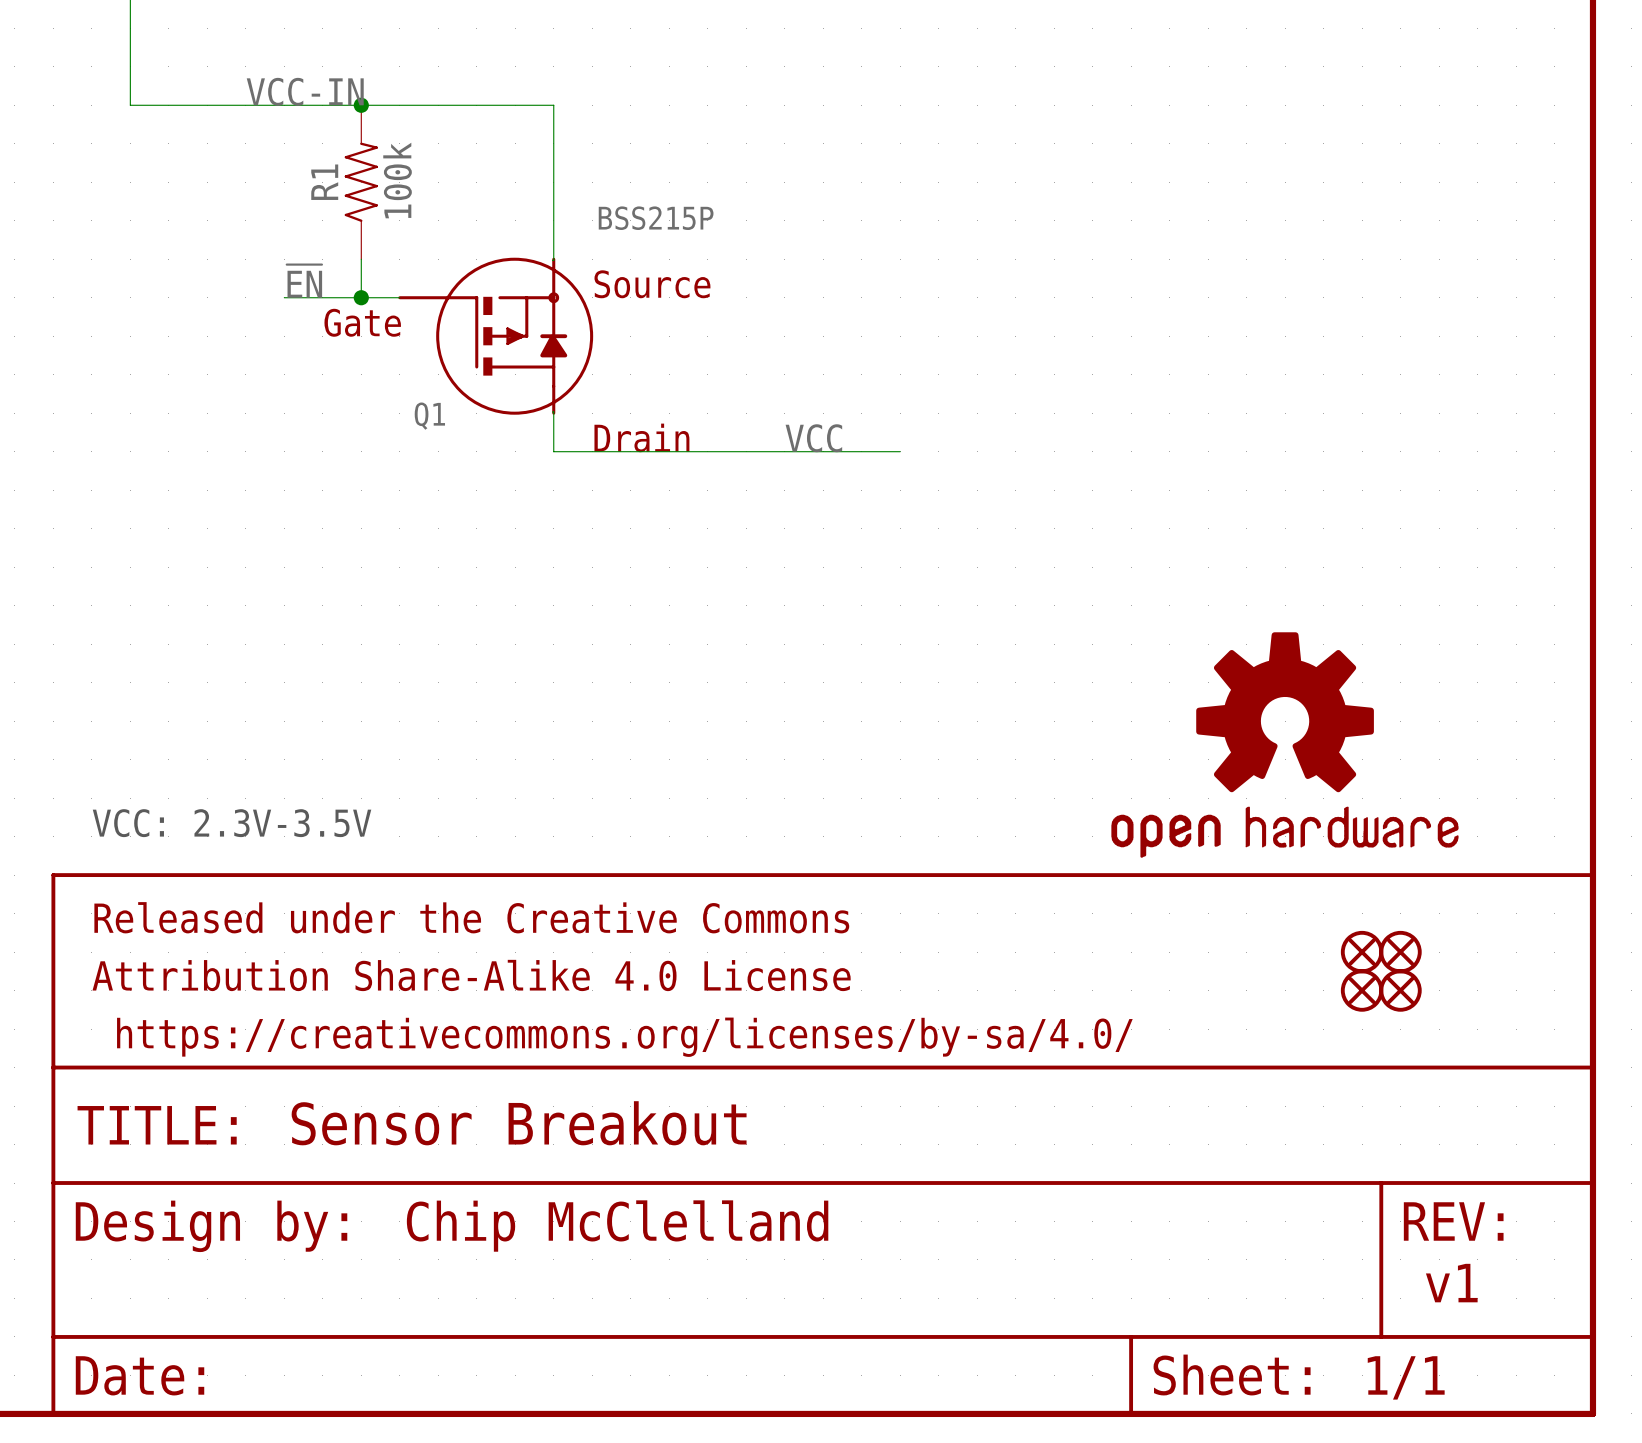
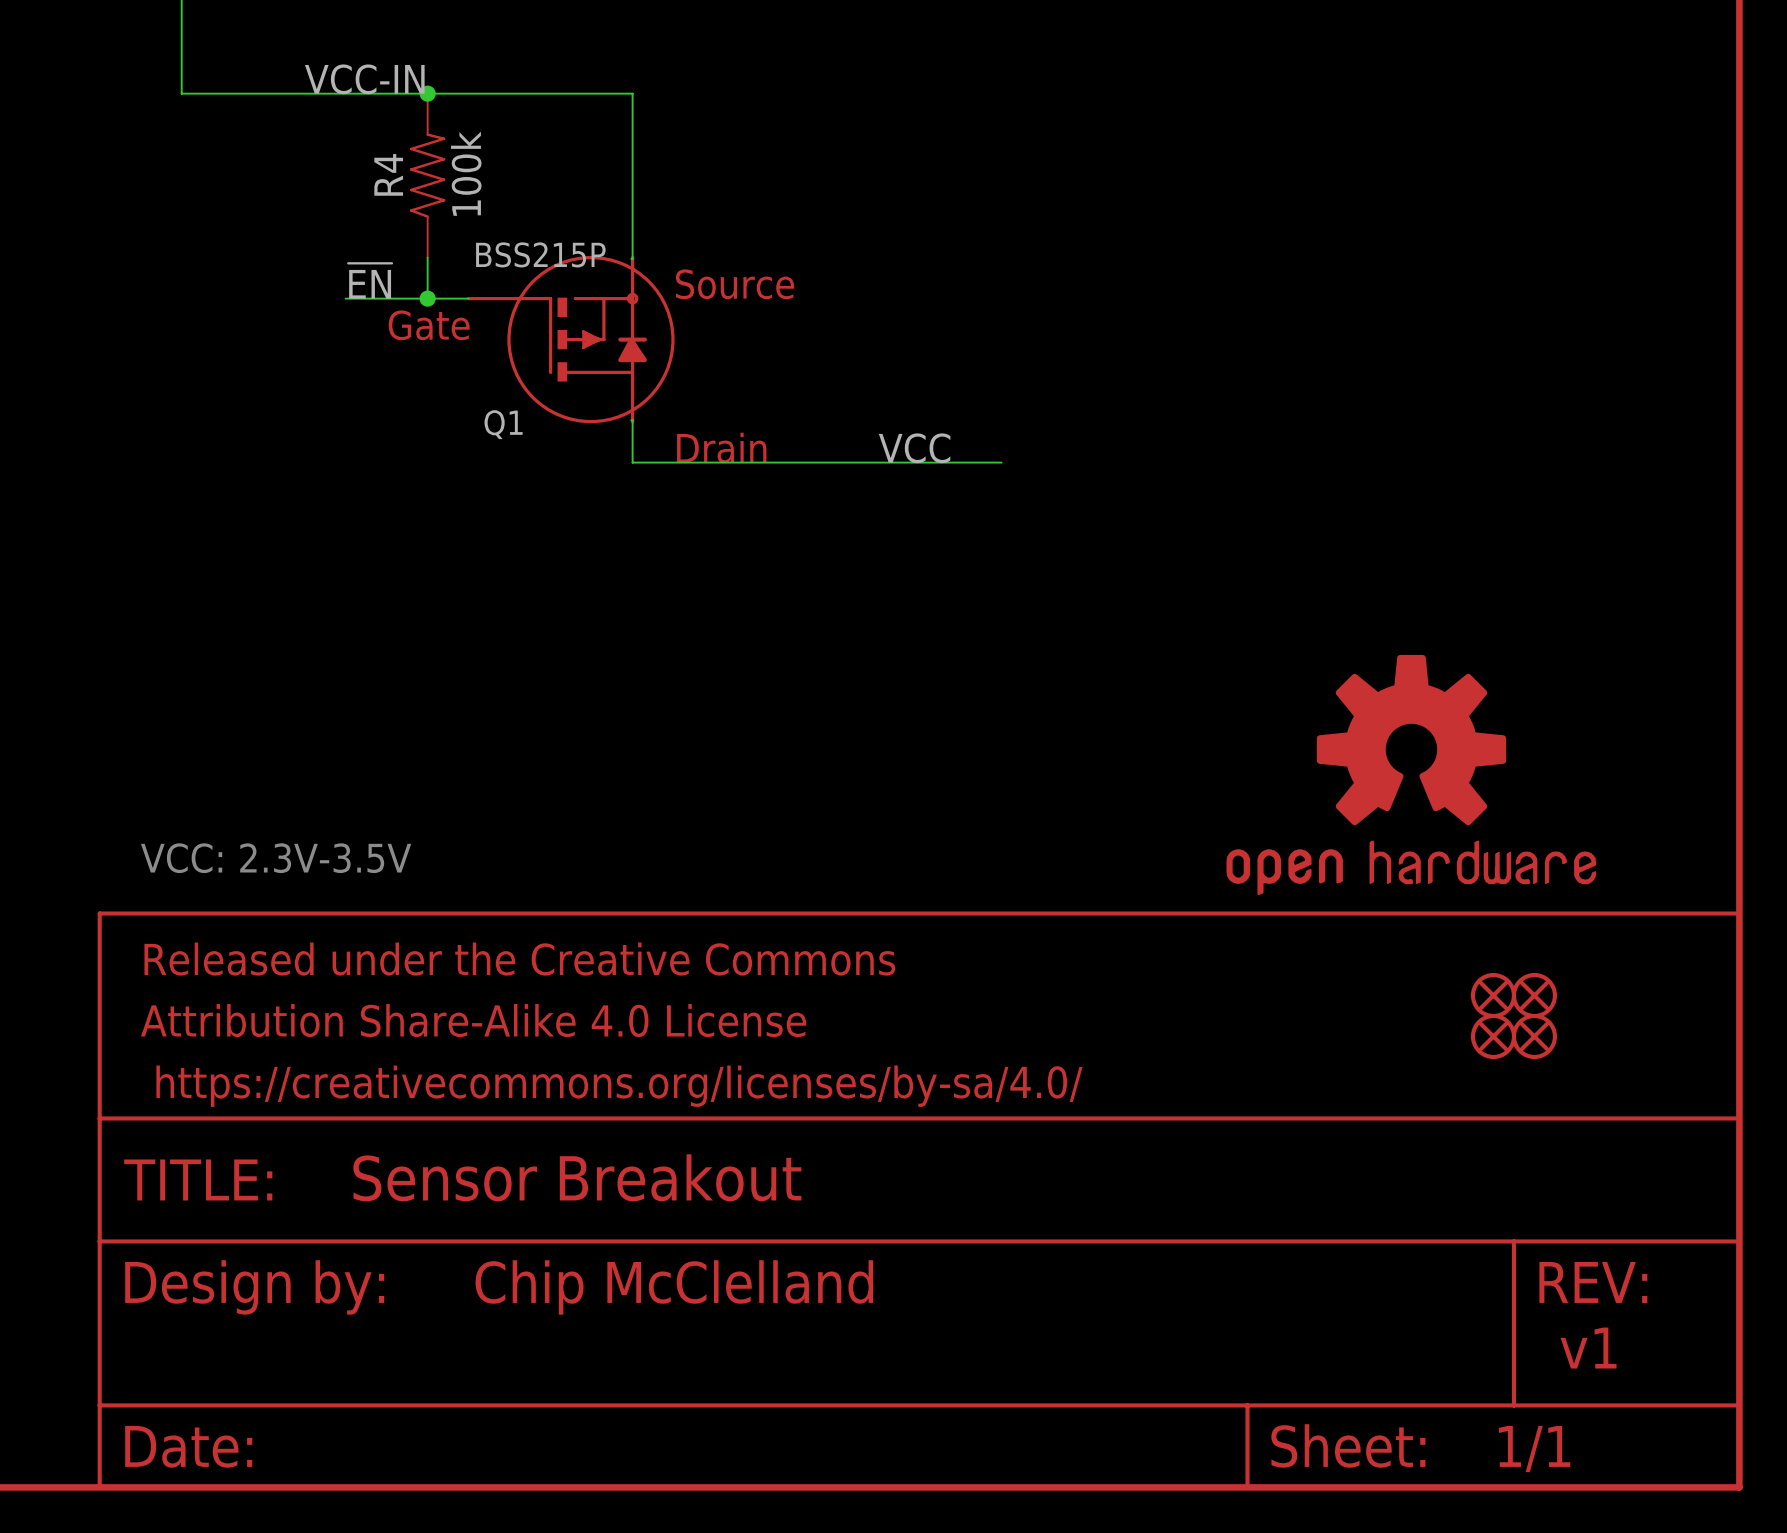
R1 name: R1 (324, 182) -> R4 (388, 174)
Q1 value position: BSS215P (656, 218) -> BSS215P (540, 254)

